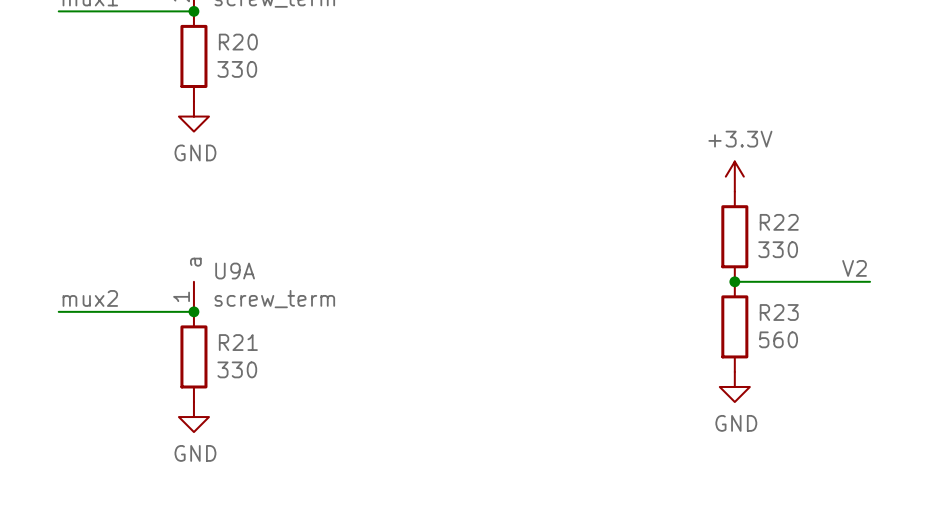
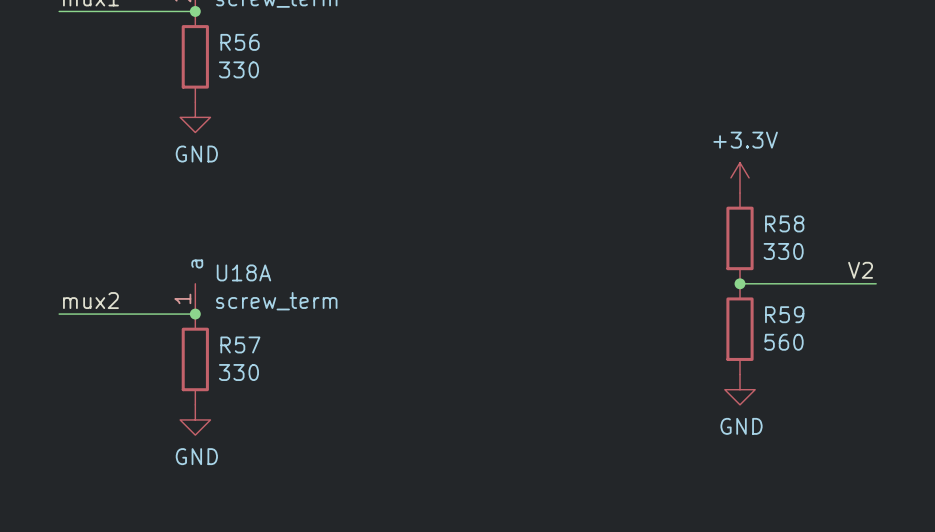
R20 name: R20 (238, 42) -> R56 (240, 42)
R22 name: R22 (779, 222) -> R58 (784, 223)
U9A name: U9A (235, 271) -> U18A (243, 272)
R23 name: R23 (779, 312) -> R59 (784, 314)
R21 name: R21 (238, 342) -> R57 (240, 344)

